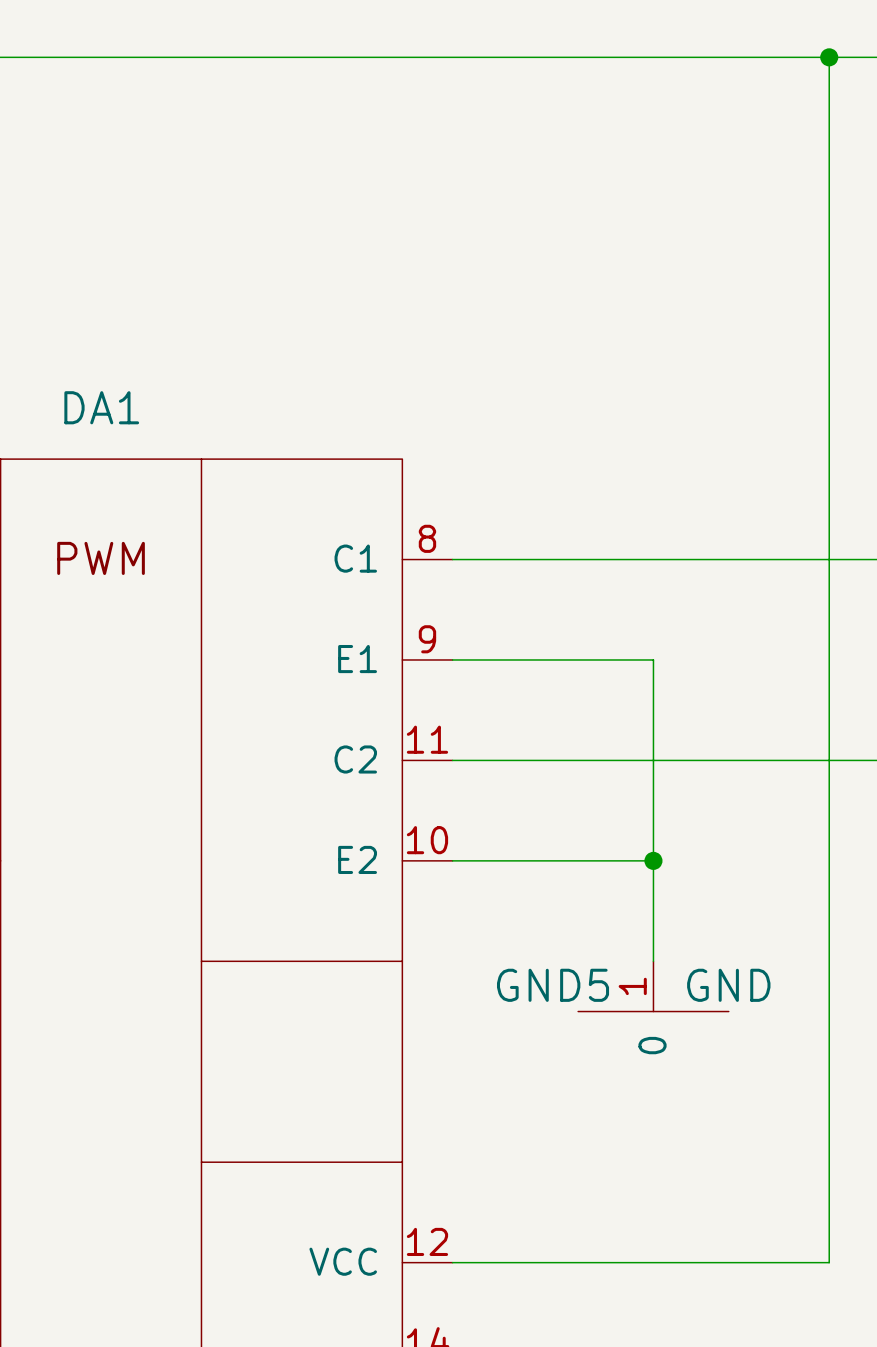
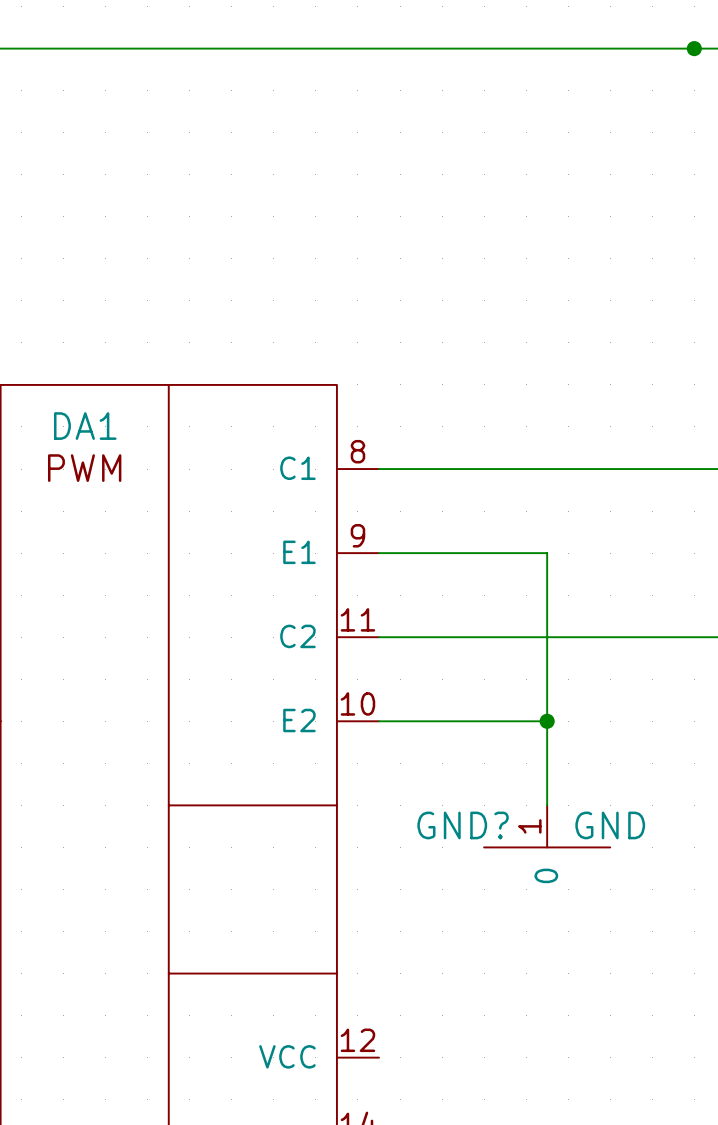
wire: (829, 57) (829, 1262) (452, 1262) -> none
DA1 name position: DA1 (101, 407) -> DA1 (85, 426)
GND5 name: GND5 (553, 985) -> GND? (463, 825)

